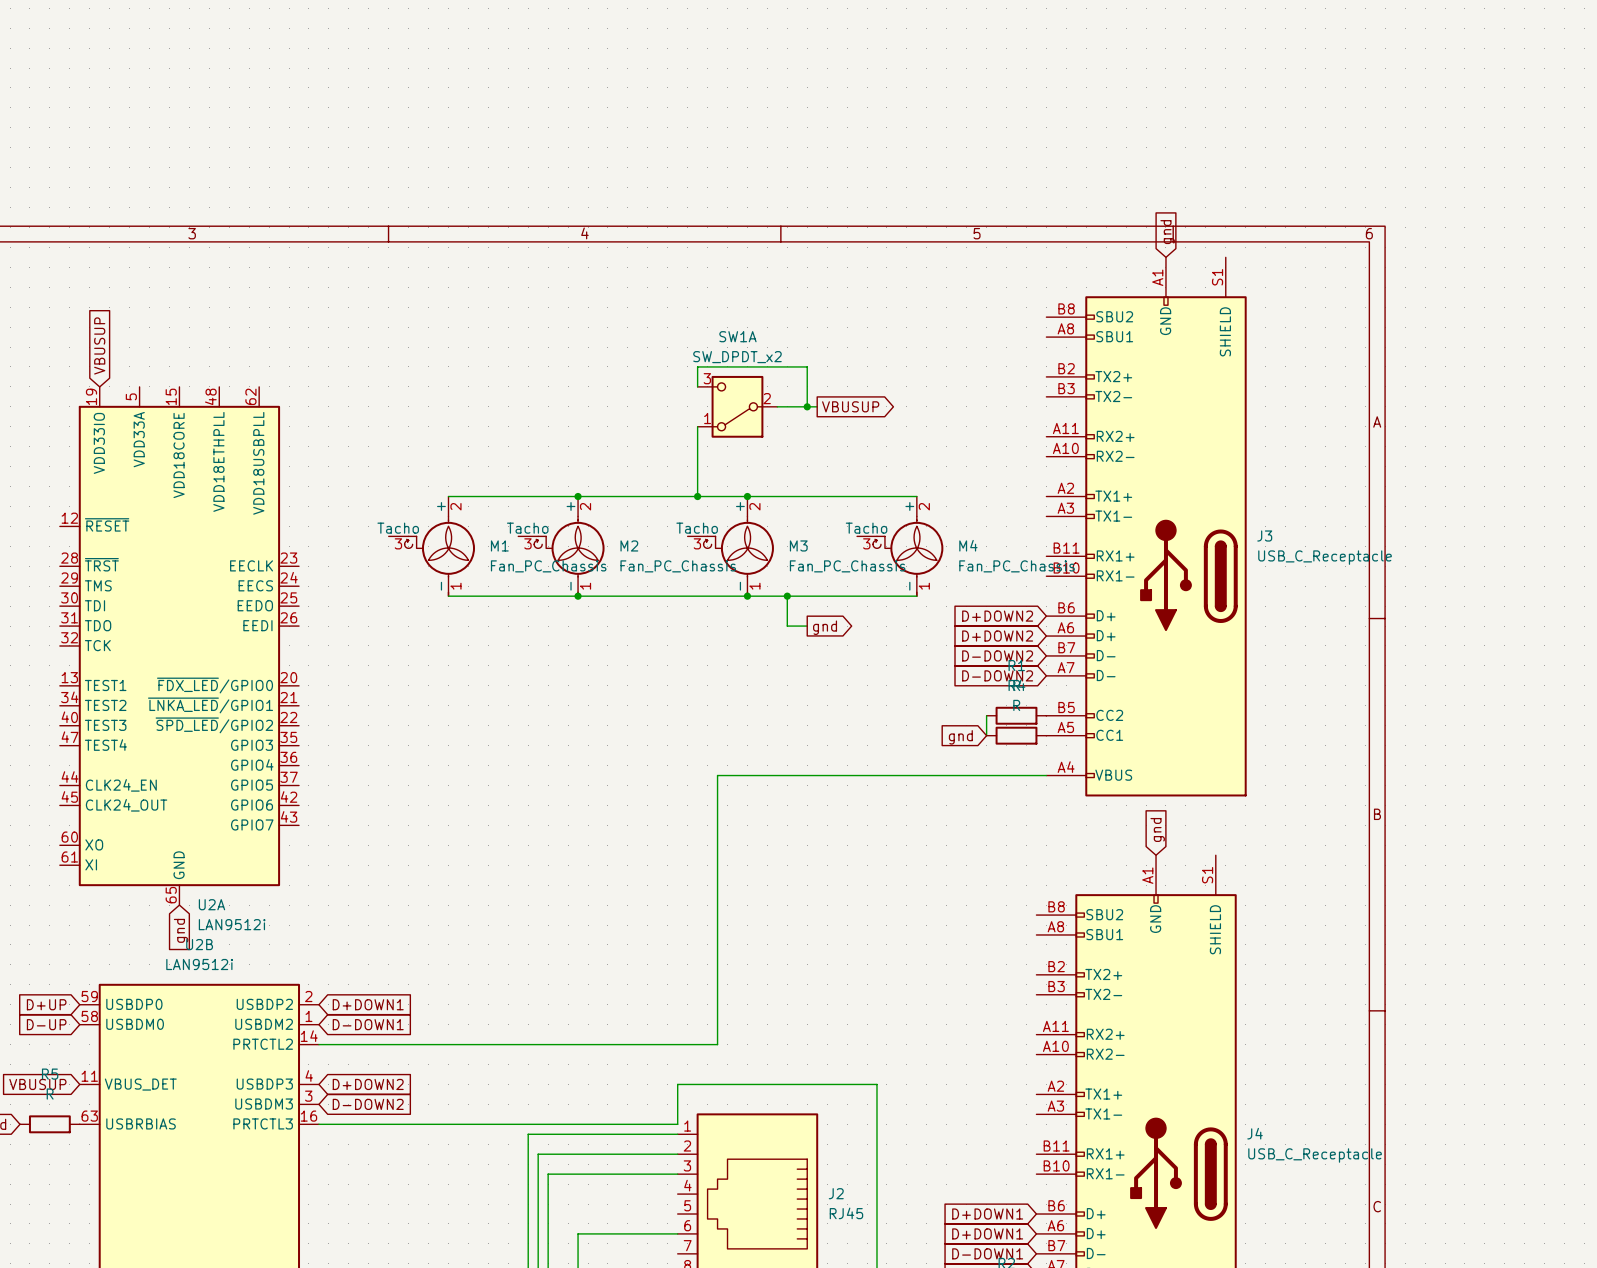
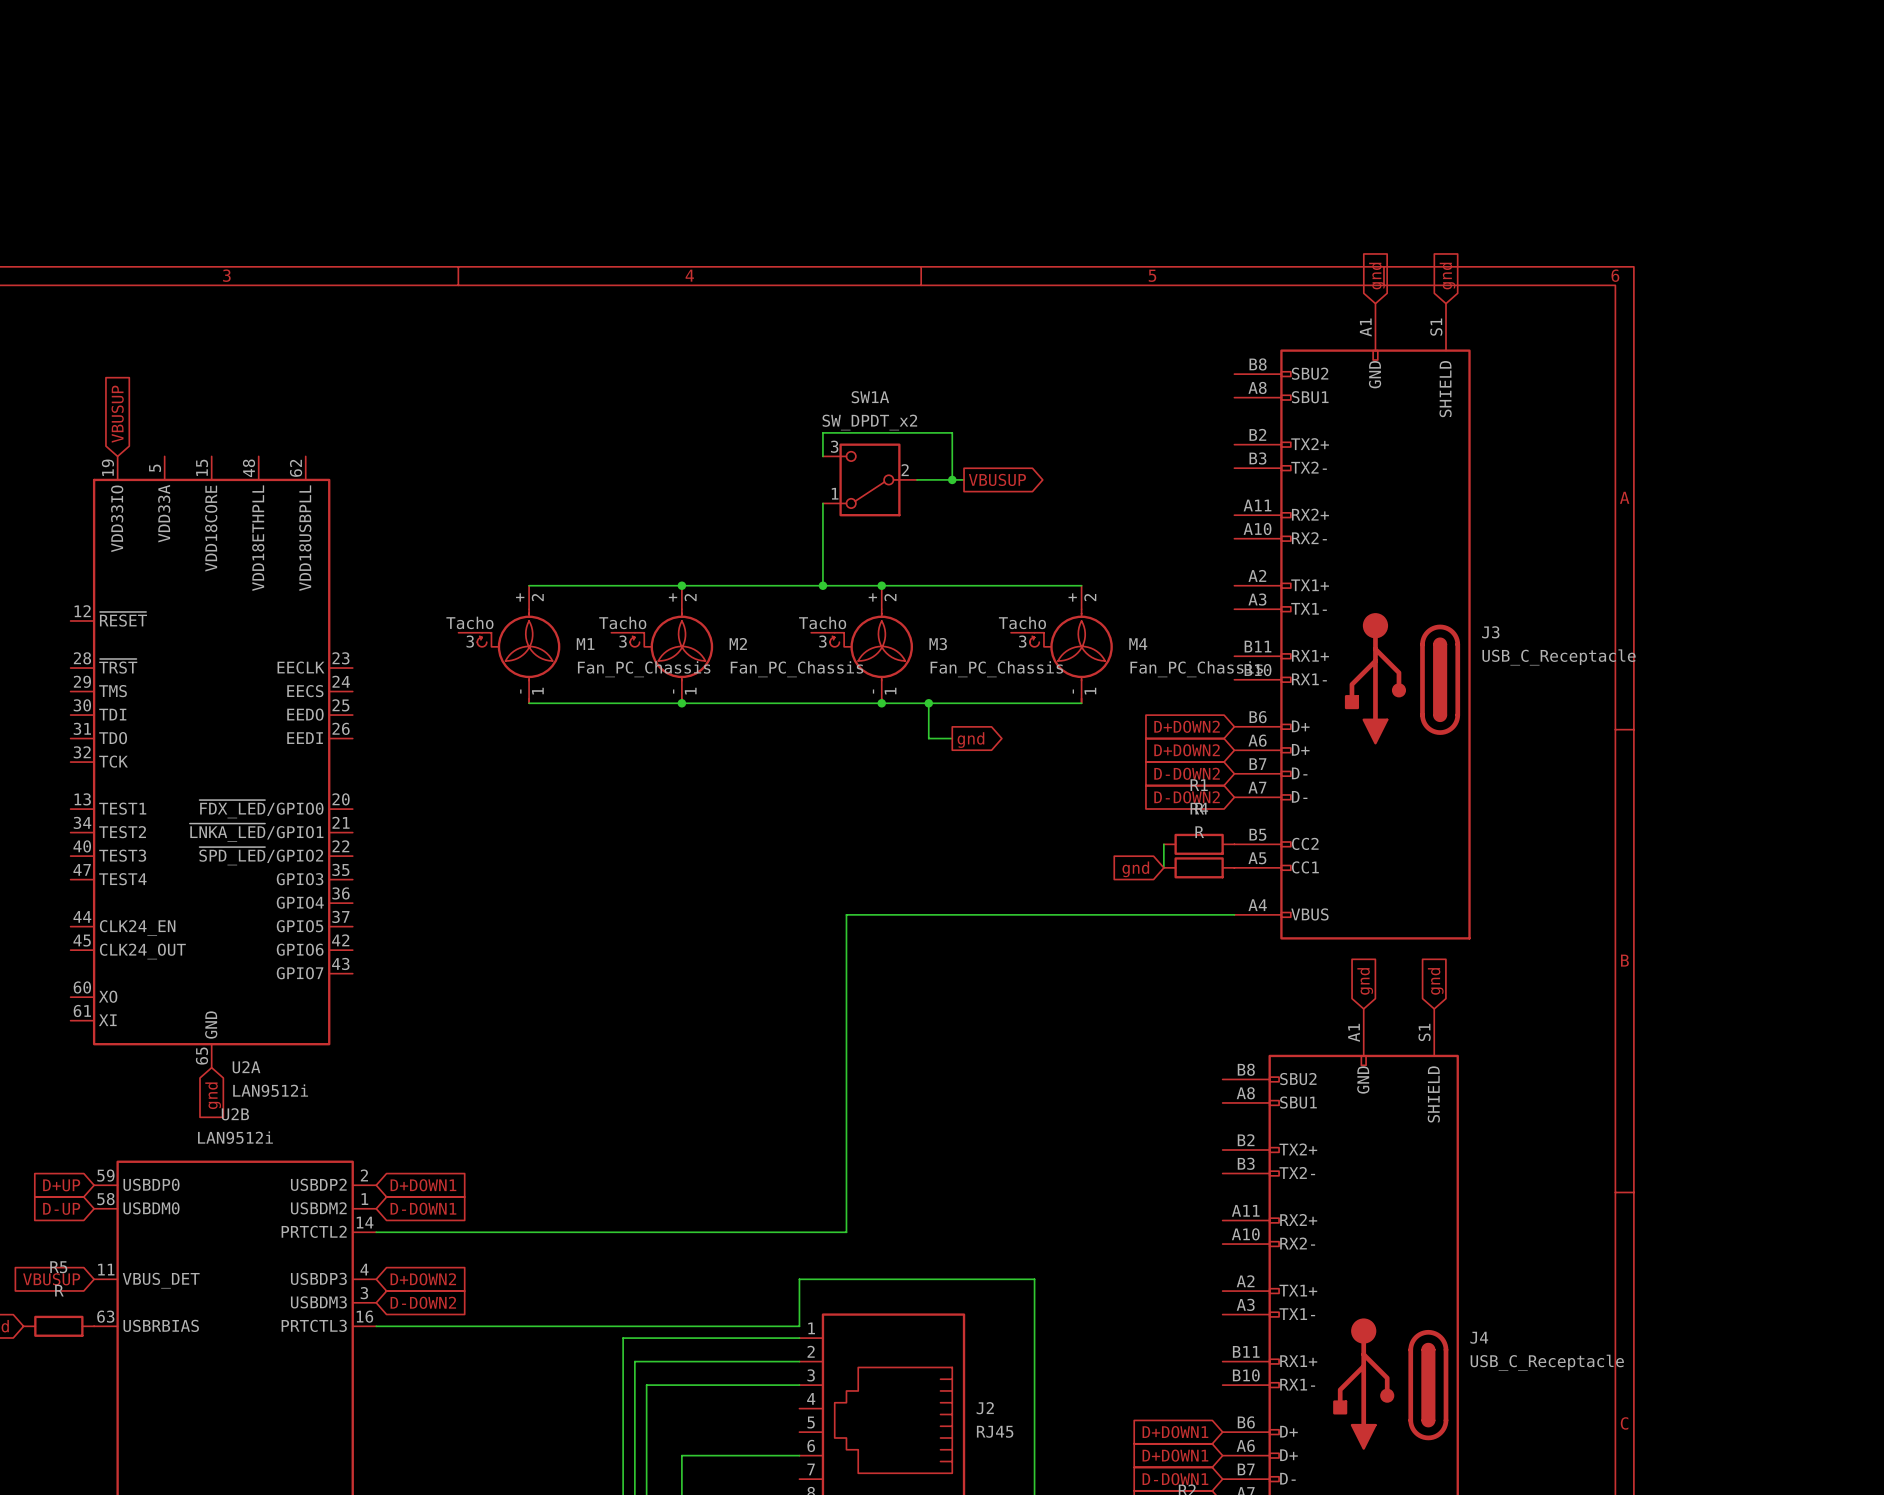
global label: none -> gnd (1447, 276)
global label: none -> gnd (1435, 981)

